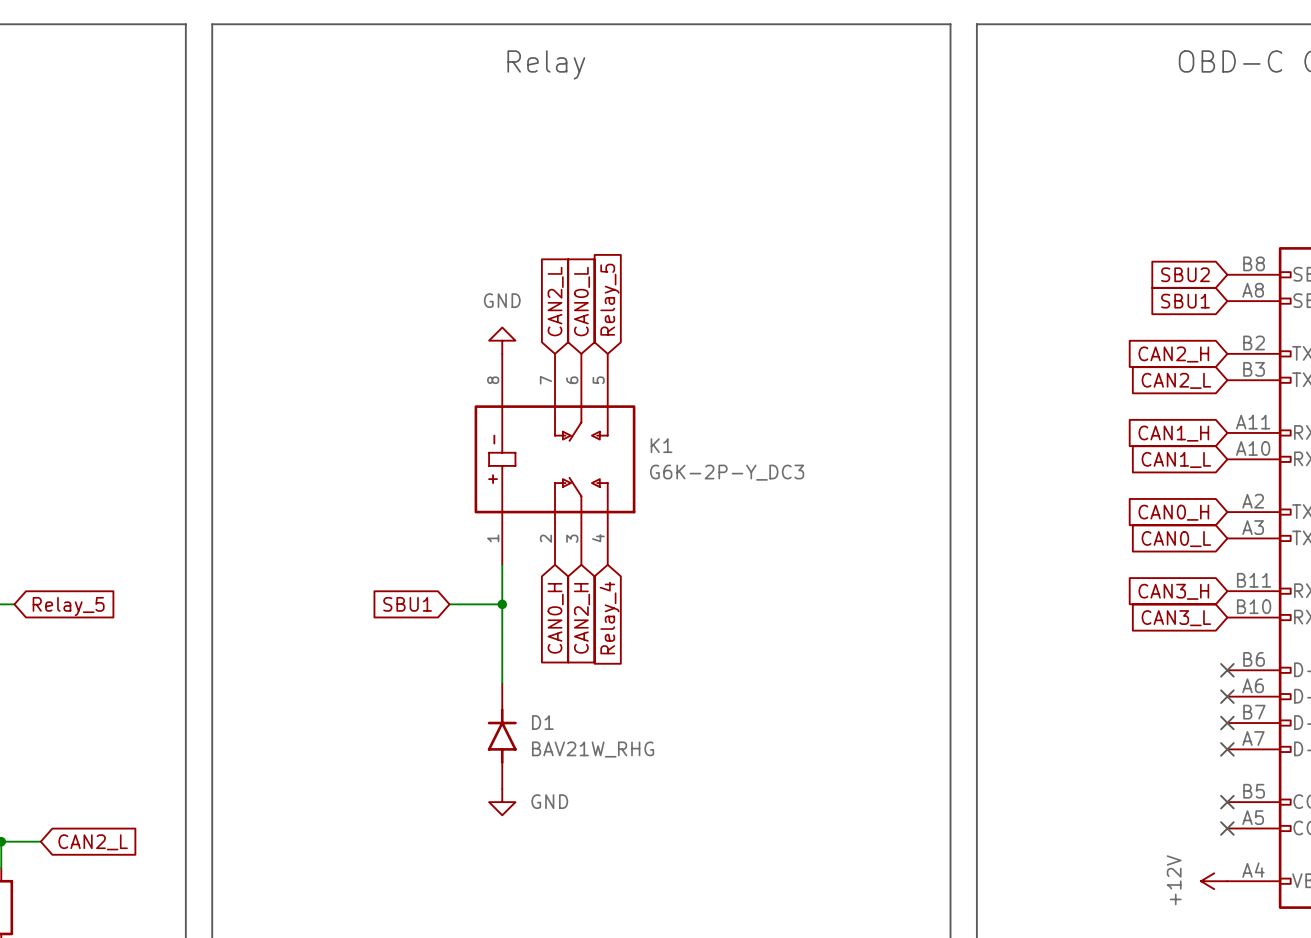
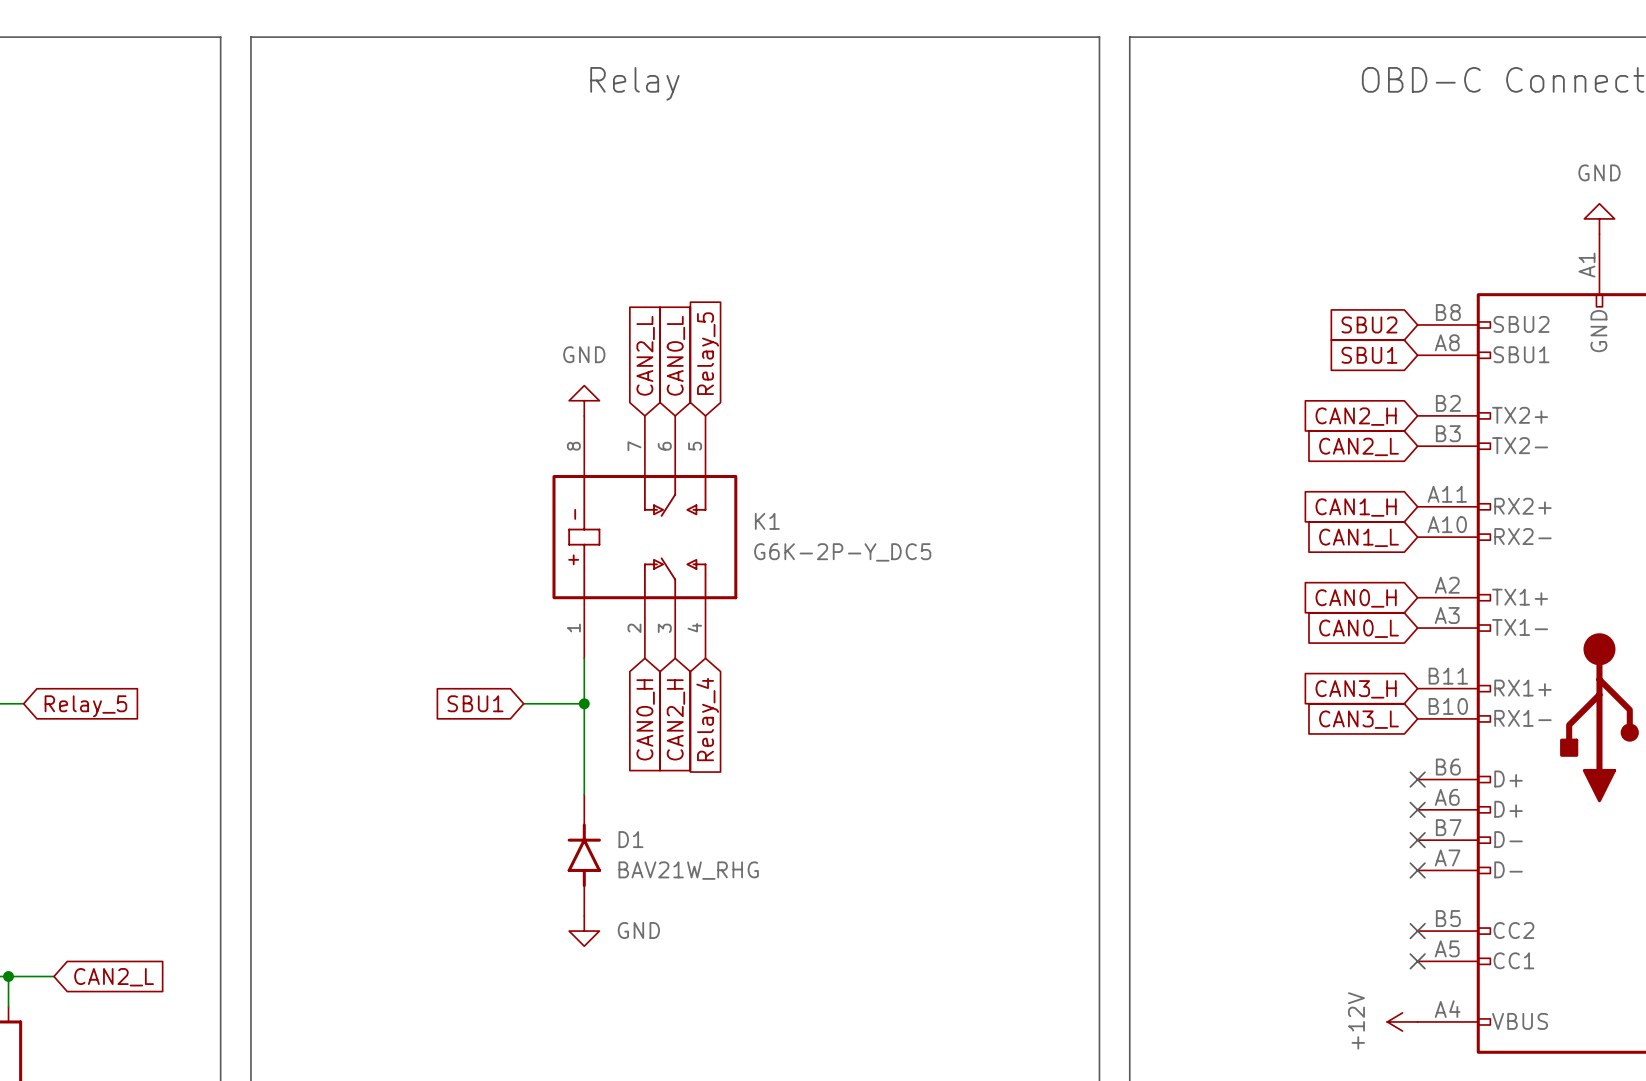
K1 value: G6K-2P-Y_DC3 (727, 472) -> G6K-2P-Y_DC5 (842, 552)

